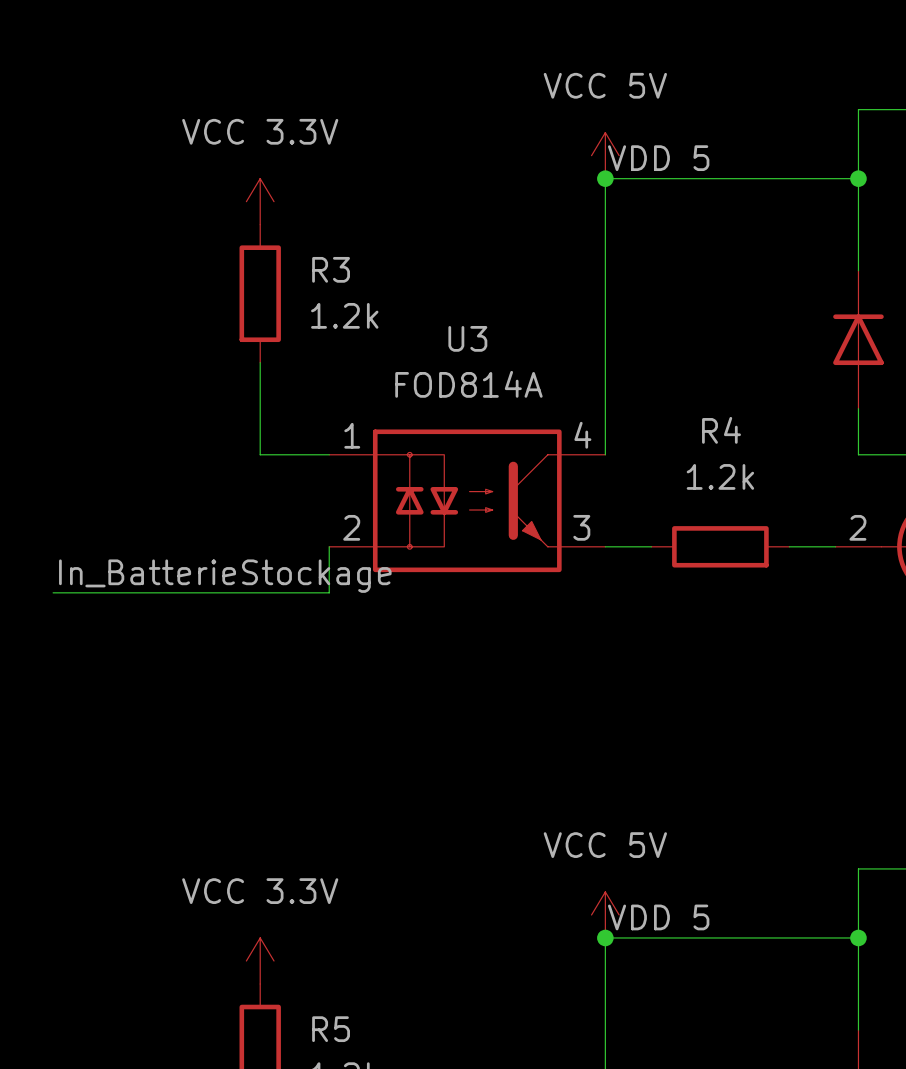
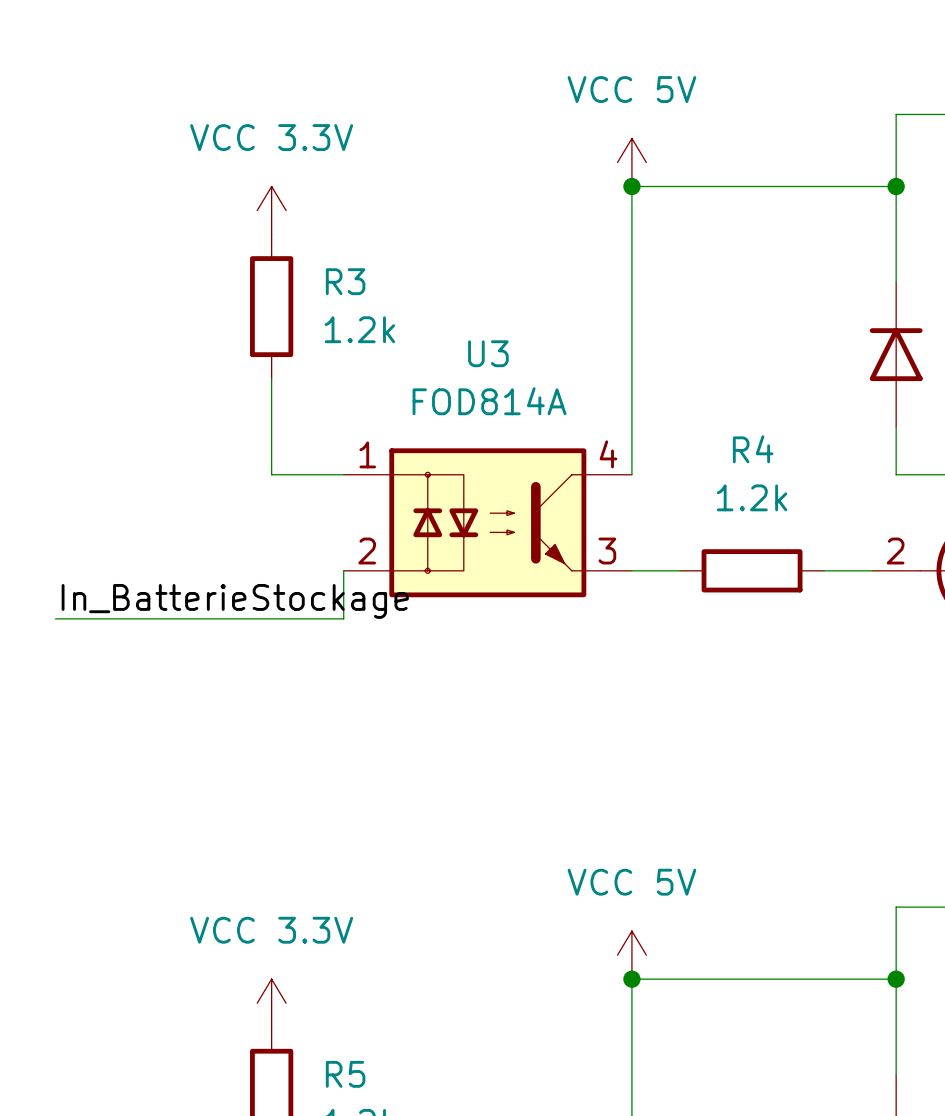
label: VDD 5 (658, 158) -> none
label: VDD 5 (658, 917) -> none

